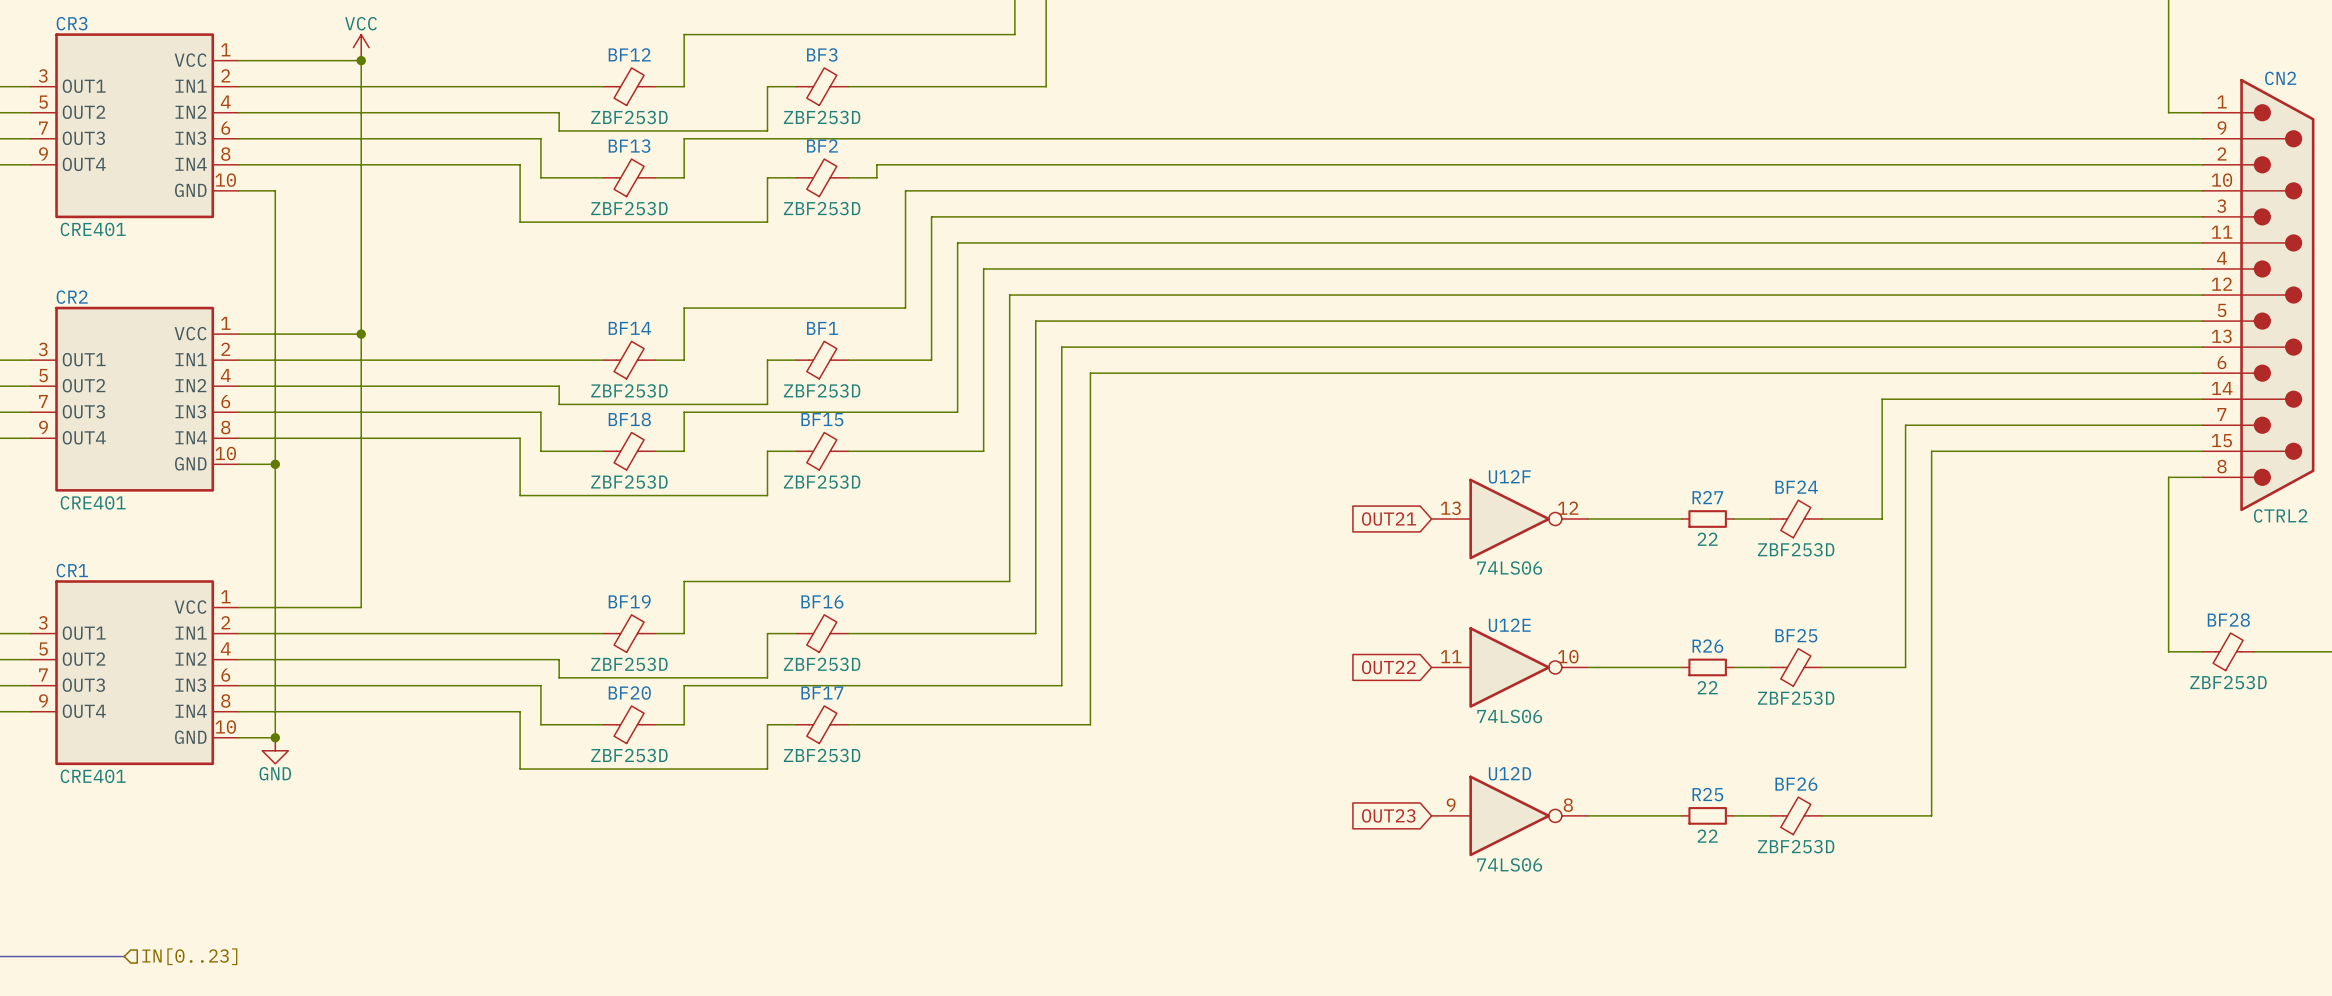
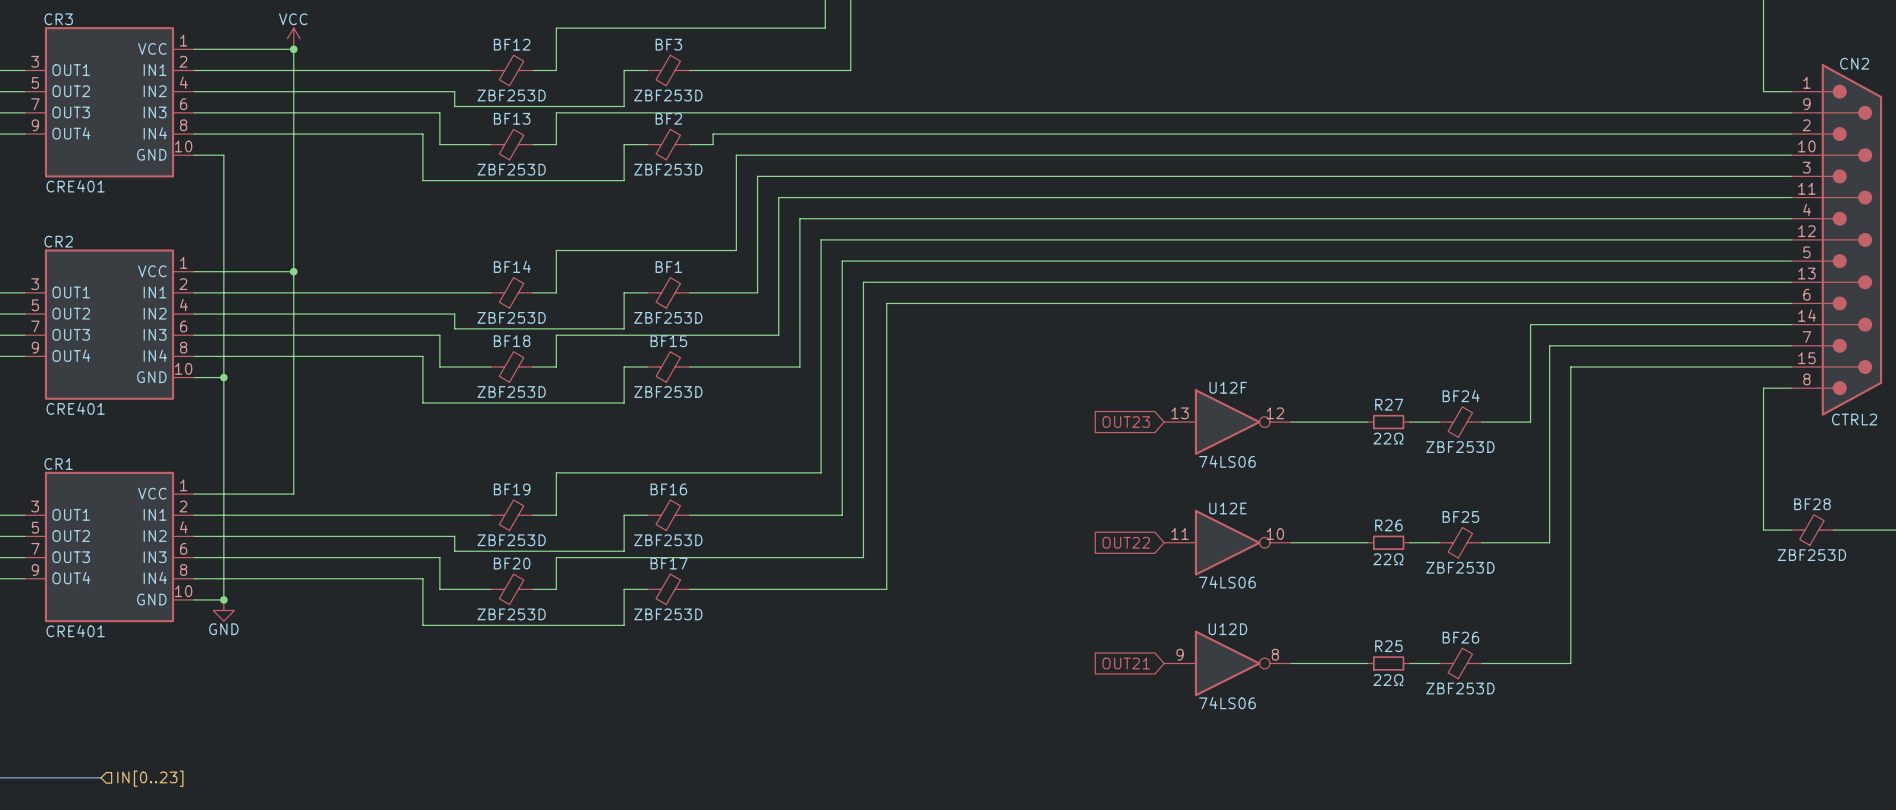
global label: OUT21 (1389, 519) -> OUT23 (1126, 422)
R27 value: 22 (1707, 539) -> 22Ω (1388, 438)
R26 value: 22 (1707, 687) -> 22Ω (1388, 559)
global label: OUT23 (1388, 815) -> OUT21 (1126, 663)
R25 value: 22 (1707, 836) -> 22Ω (1388, 680)

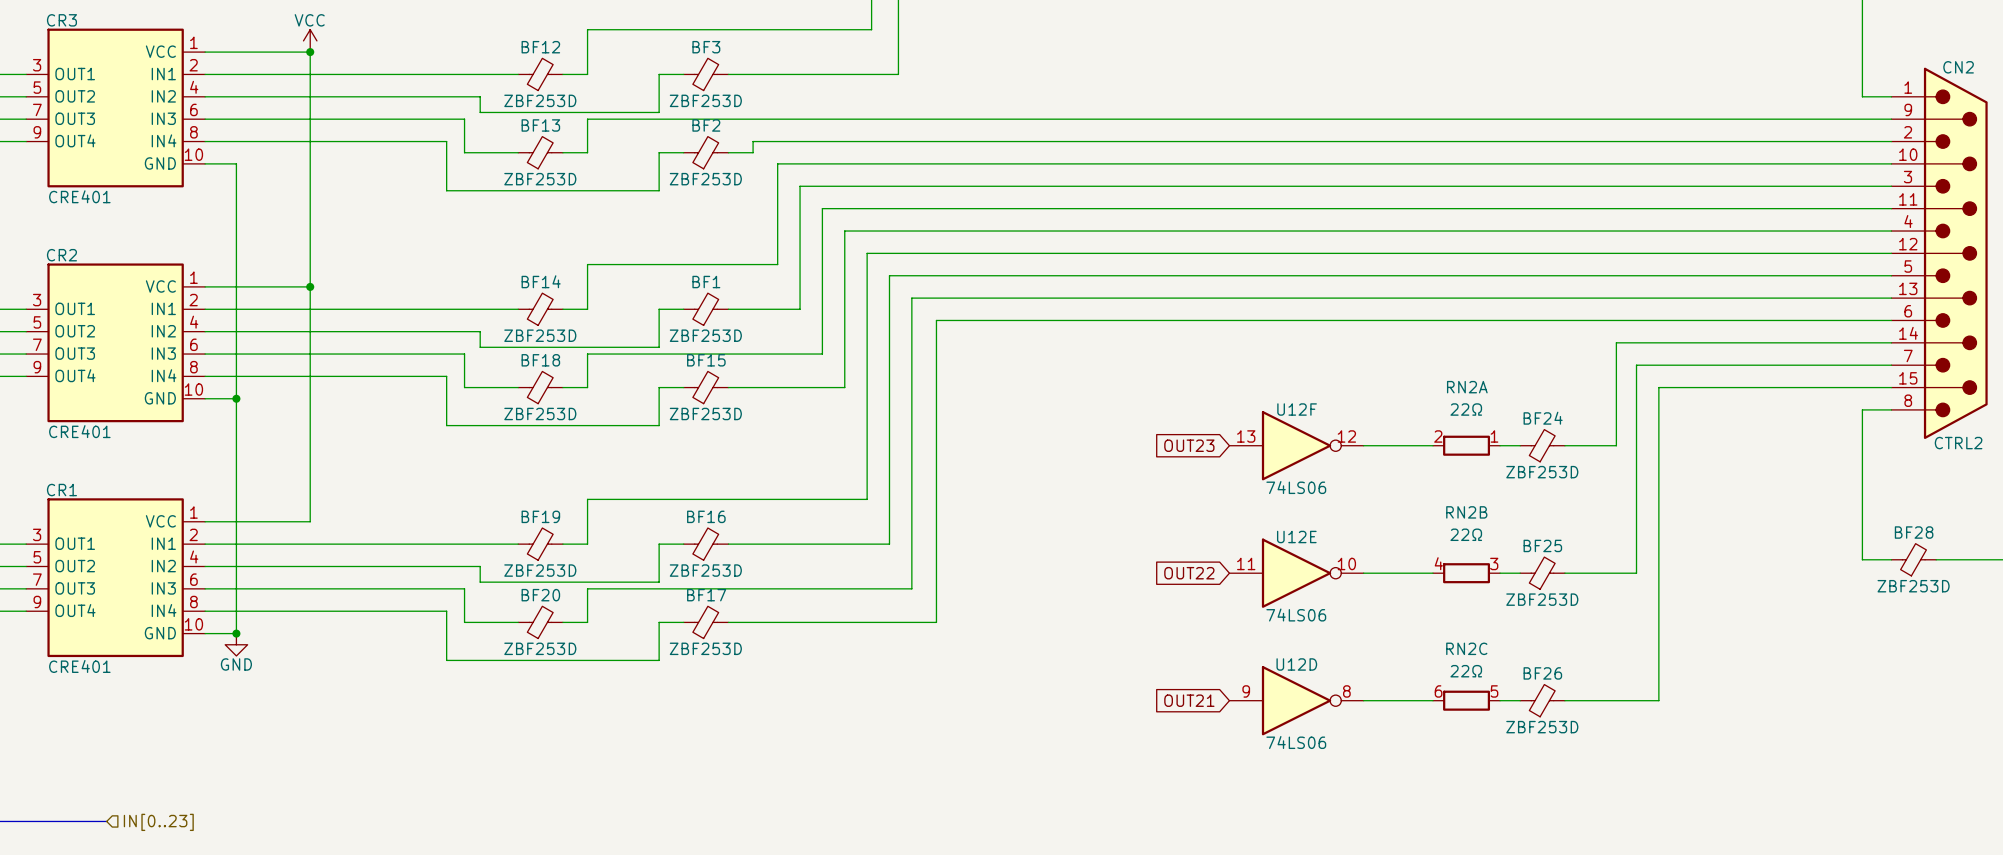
R27: 22Ω (1388, 422) -> none
RN2A: none -> 22Ω (1466, 445)
R26: 22Ω (1388, 542) -> none
RN2B: none -> 22Ω (1466, 573)
R25: 22Ω (1388, 663) -> none
RN2C: none -> 22Ω (1466, 700)

